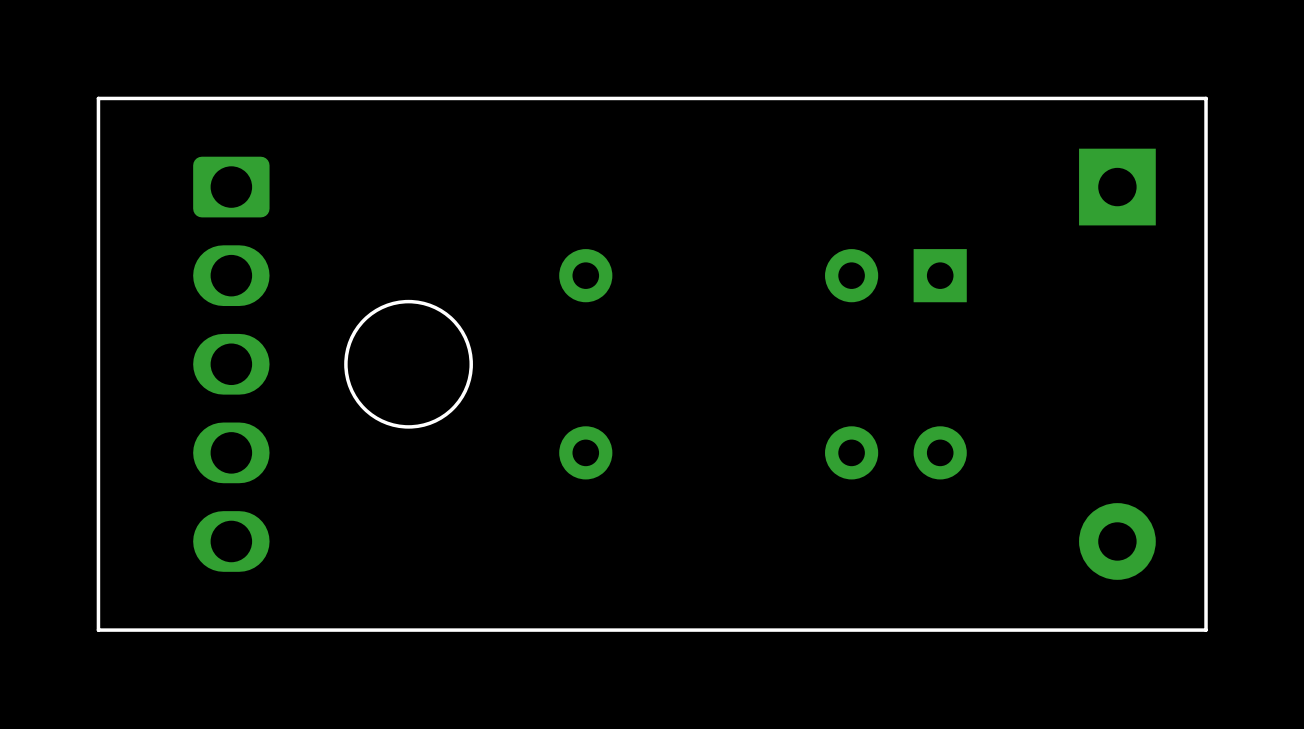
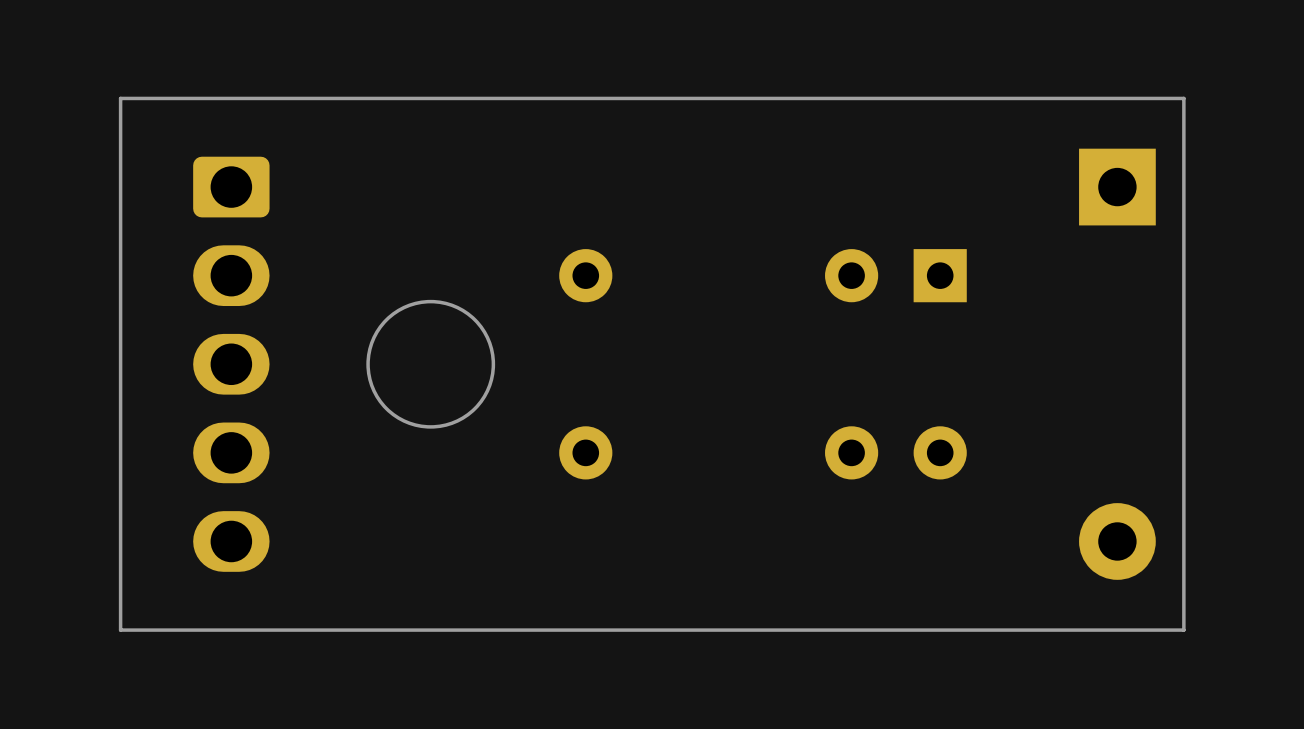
board edge: (120, 98) (98, 98) (98, 630) (120, 630) -> (120, 98) (120, 630)
board edge: (1183, 98) (1206, 98) (1206, 630) (1183, 630) -> (1183, 98) (1183, 630)
round board edge position: (408, 364) -> (430, 364)

